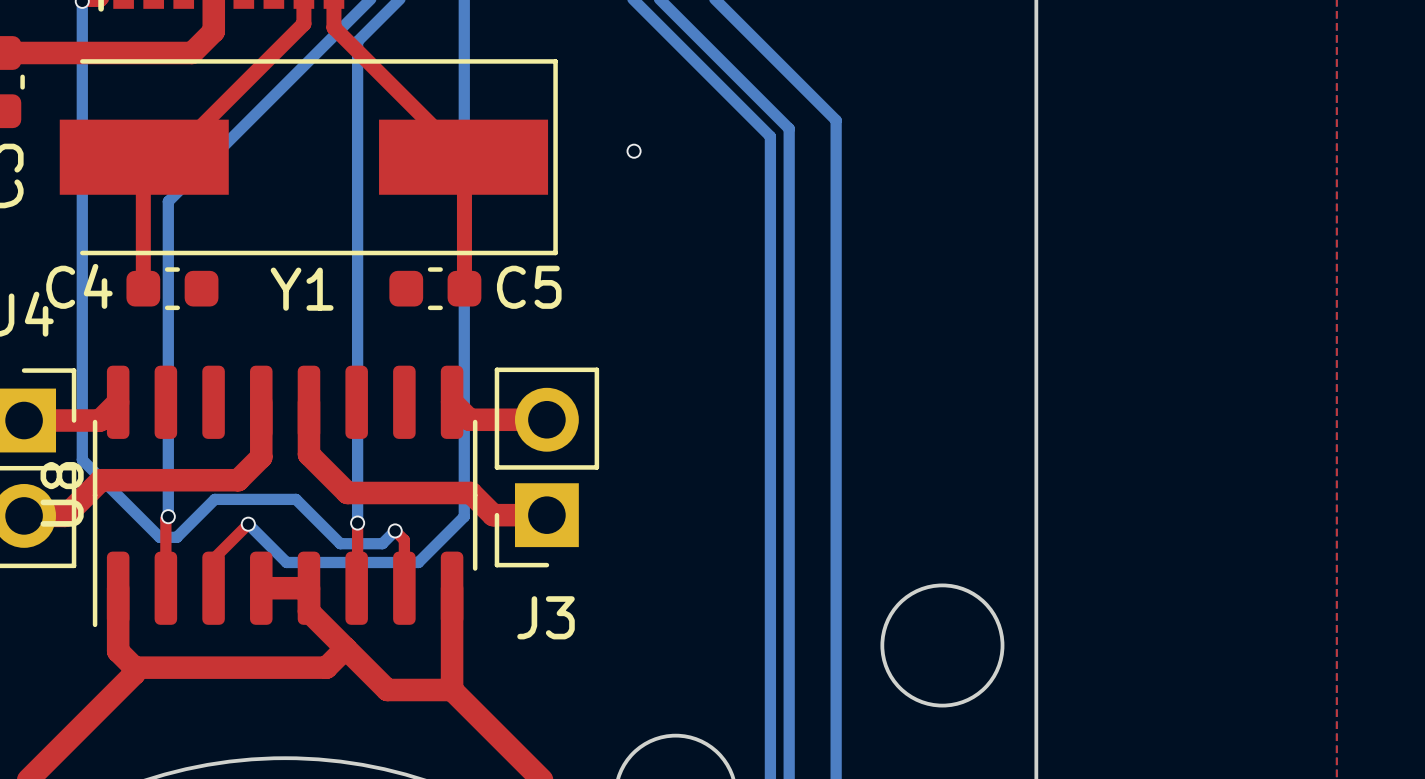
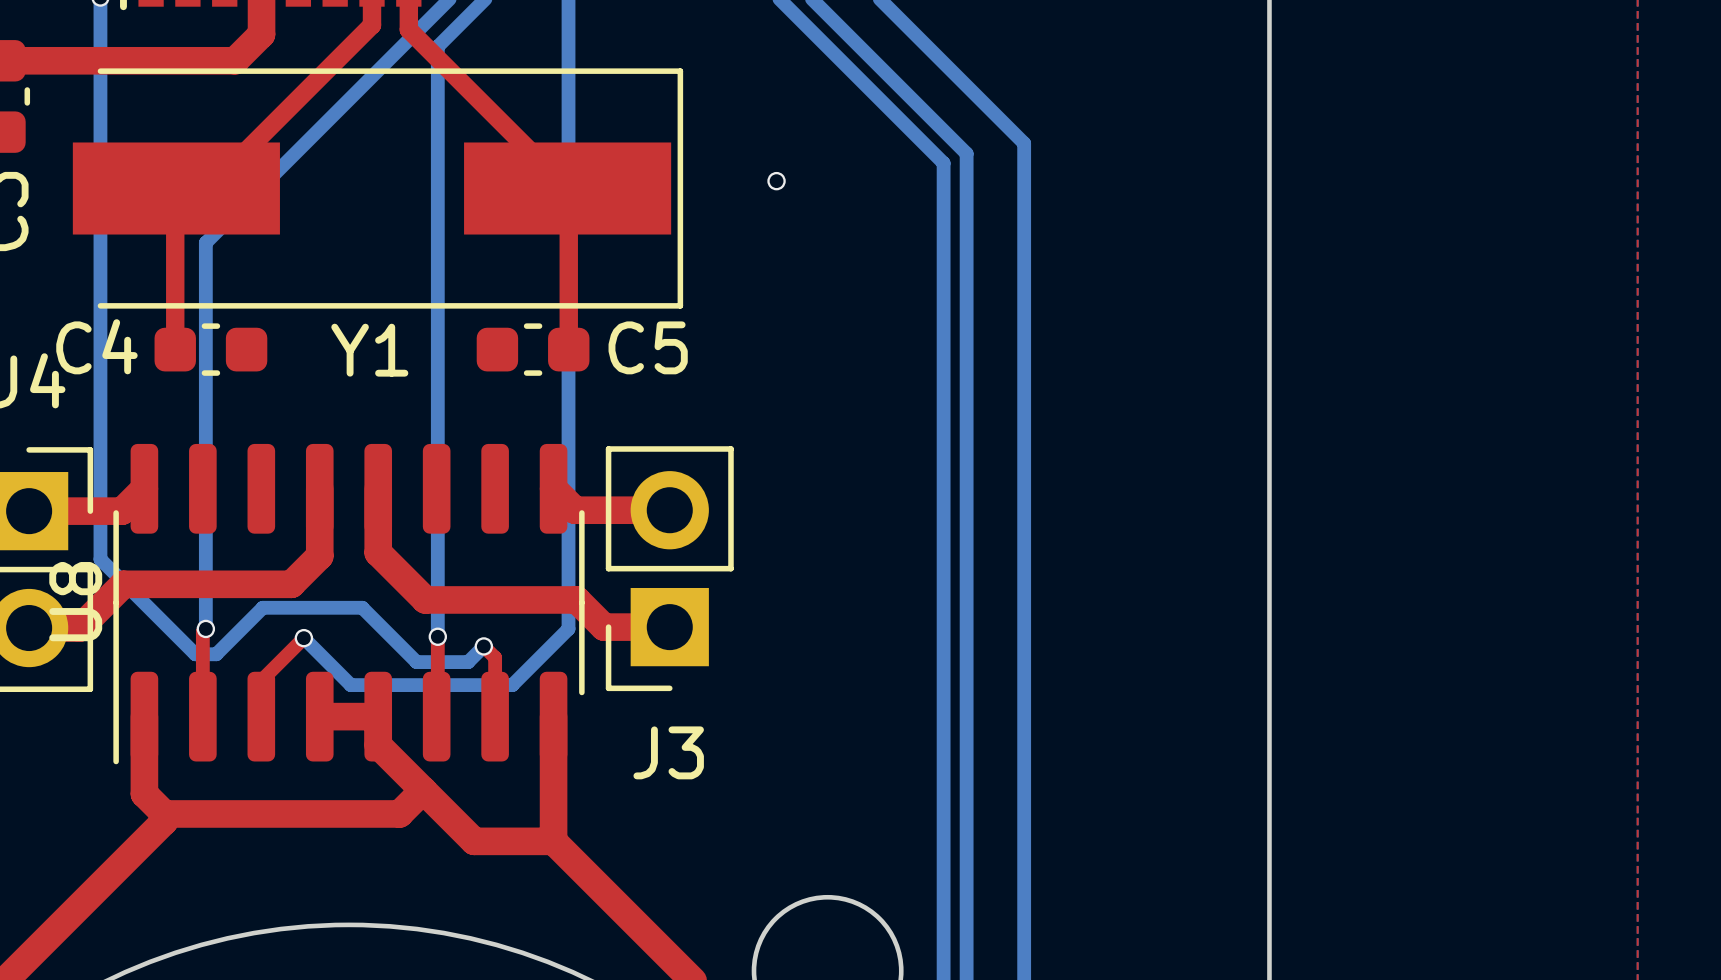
round board edge: [880, 583, 1005, 708] -> none

